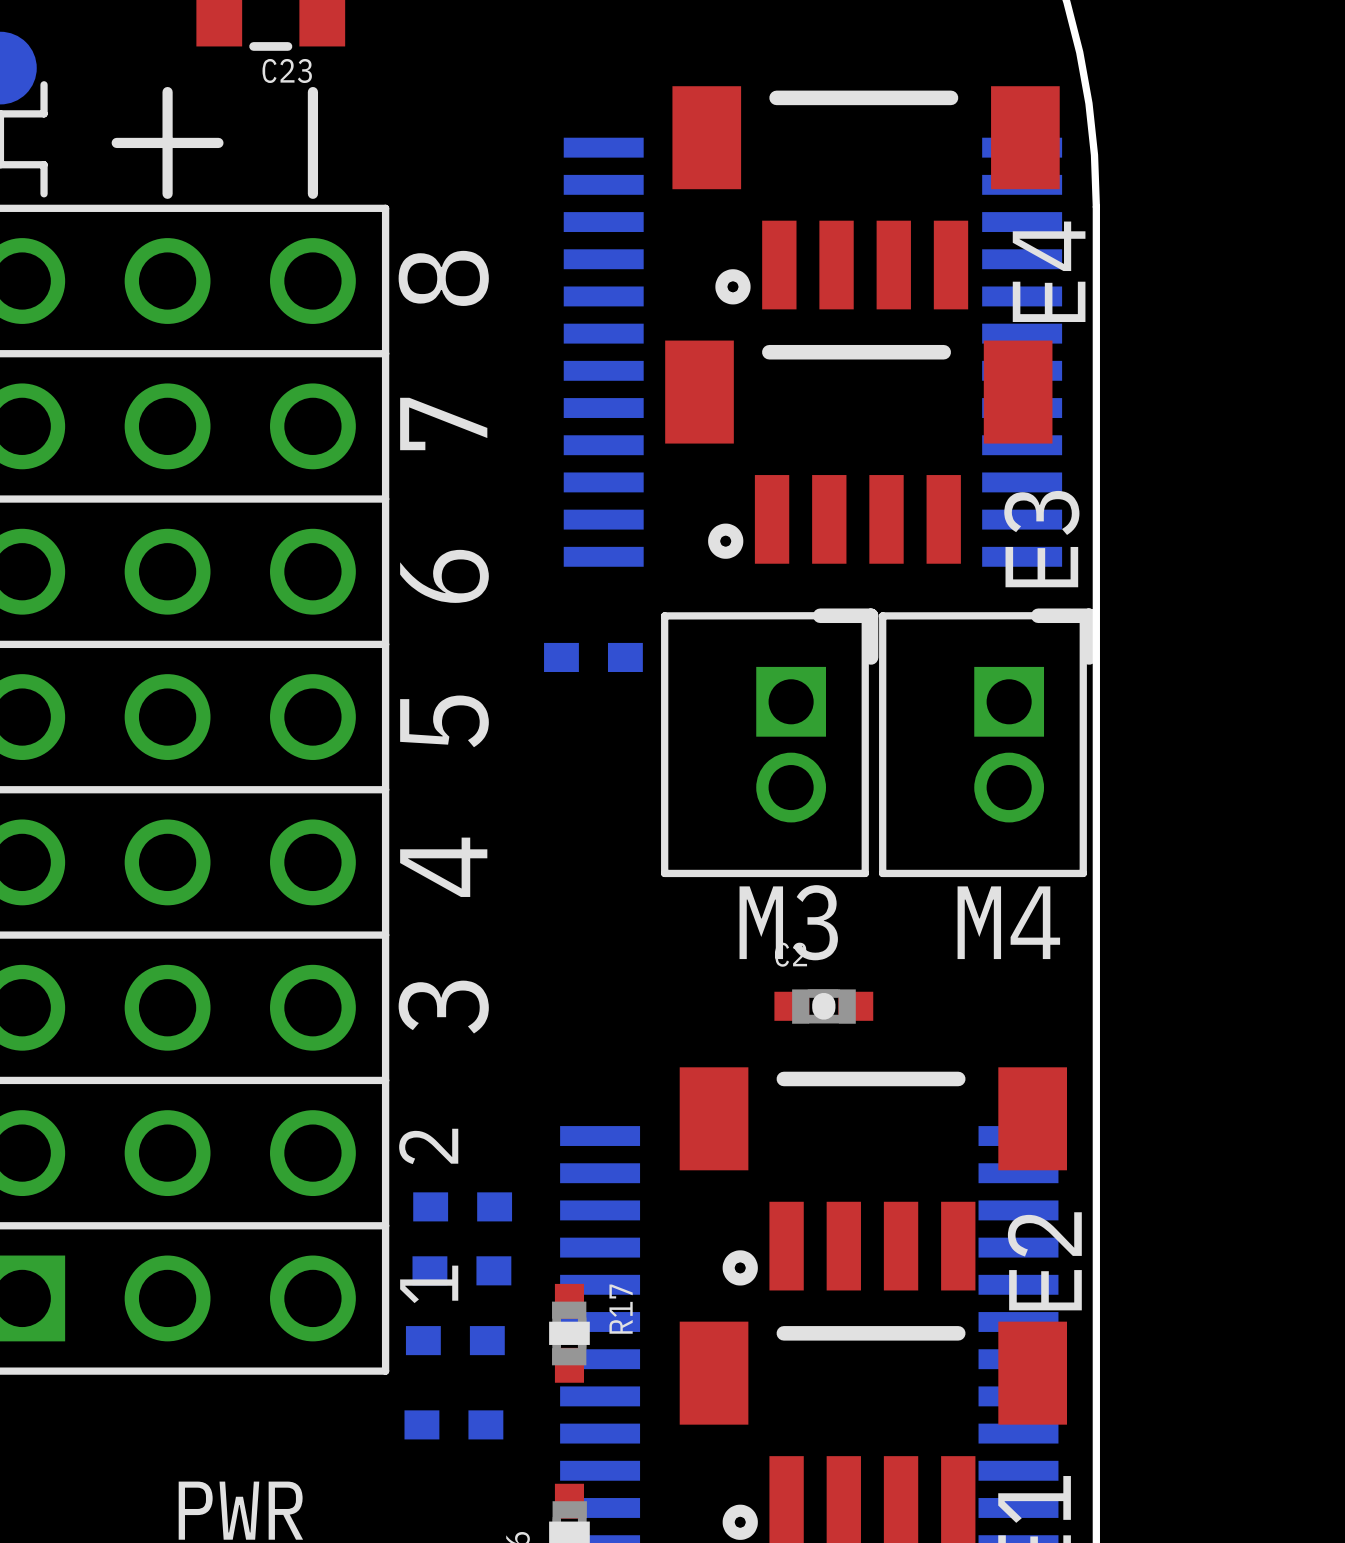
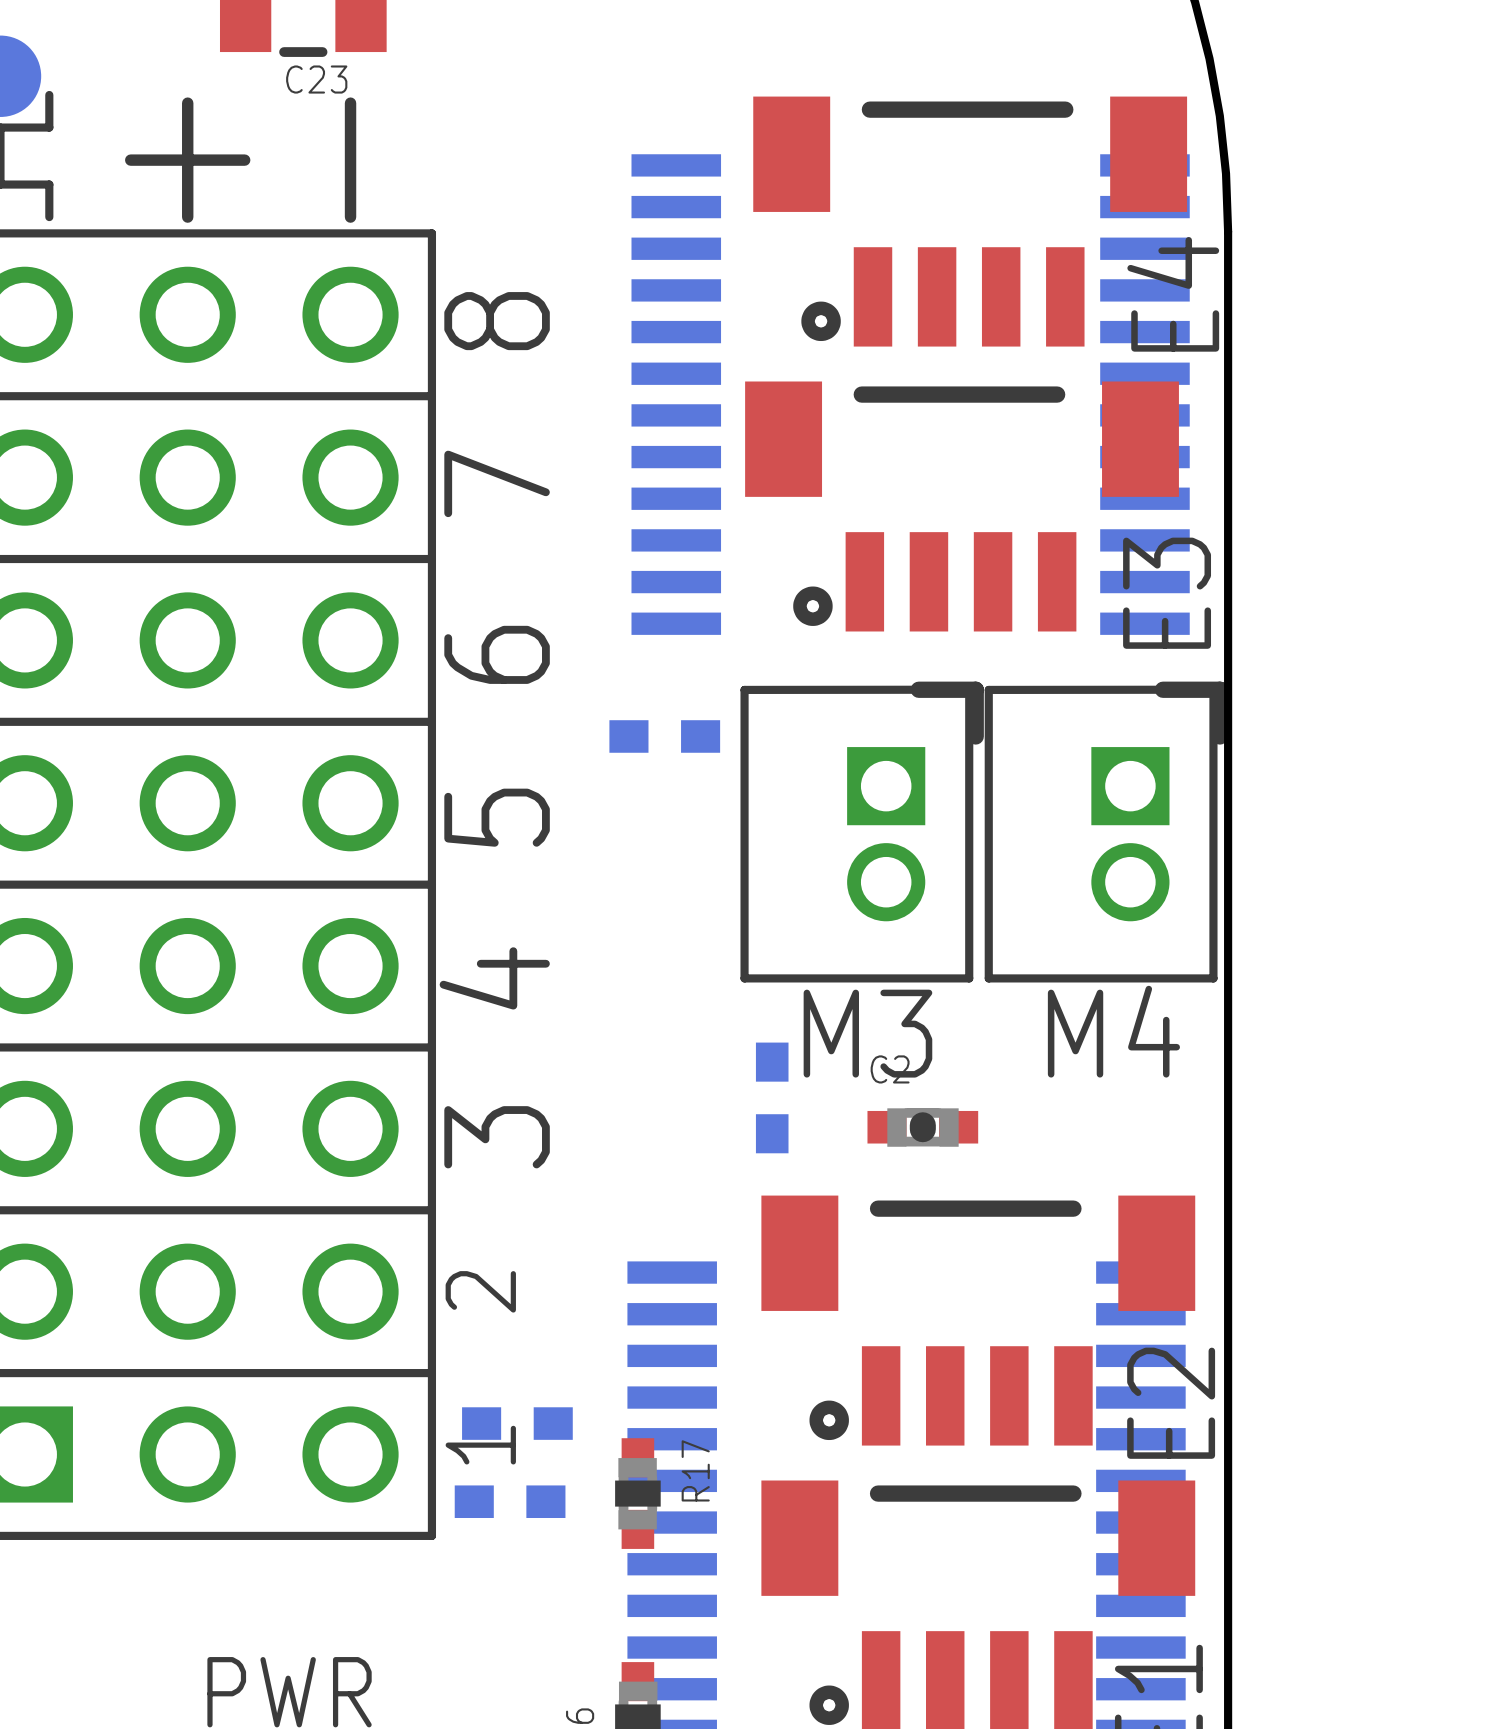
part: none -> (772, 1097)
part: (462, 1206) -> none
part: (453, 1424) -> none

